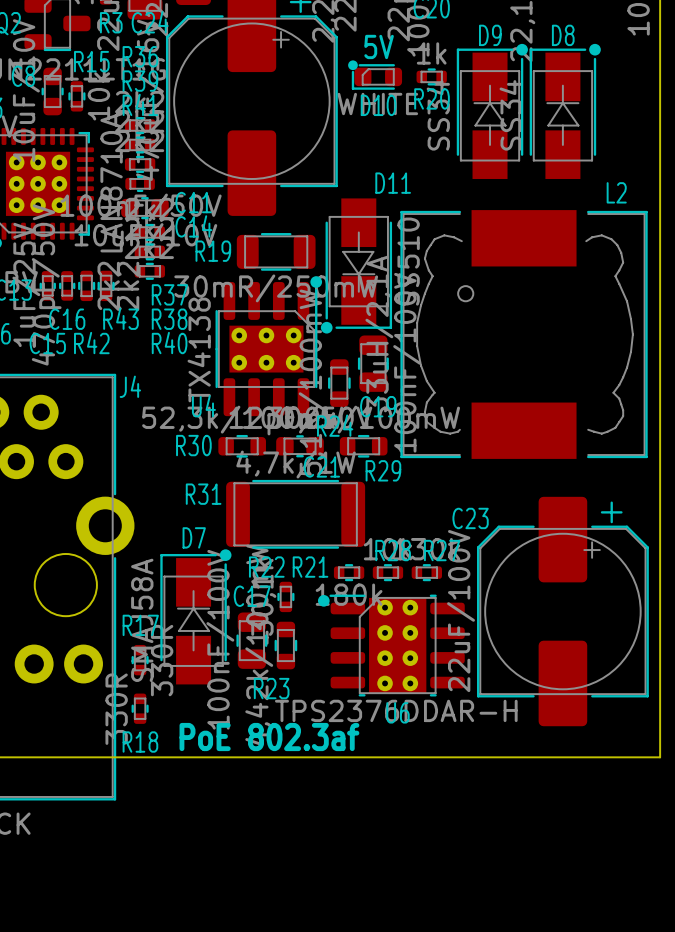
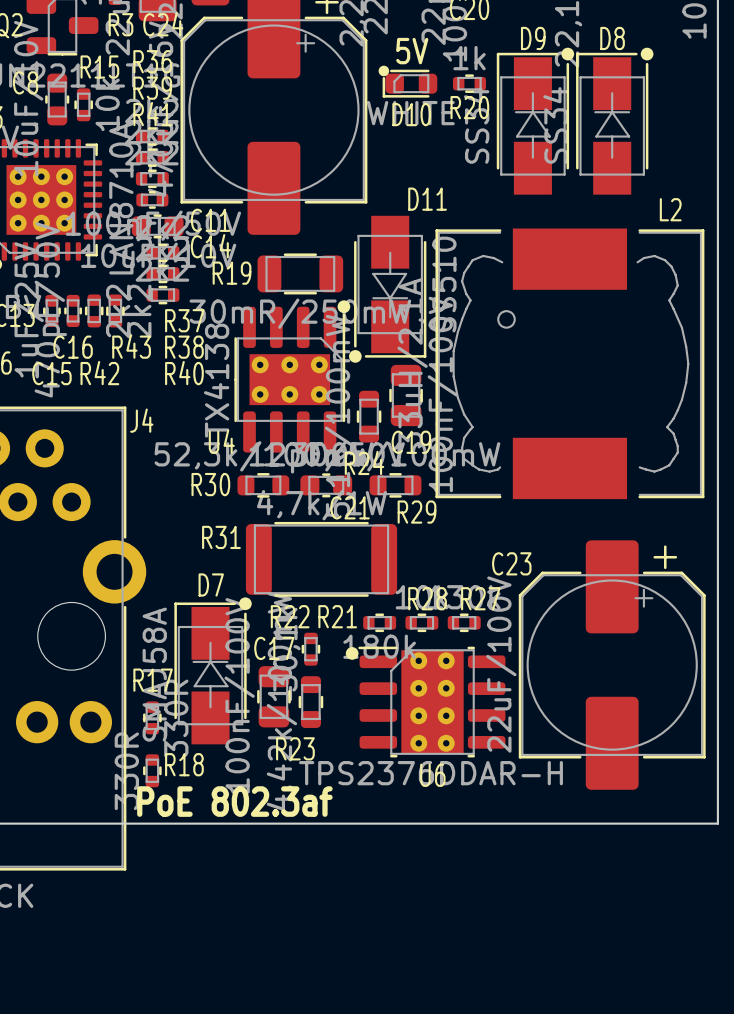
text position: PoE 802.3af (269, 737) -> PoE 802.3af (234, 801)
R18 name position: R18 (140, 742) -> R18 (184, 764)

